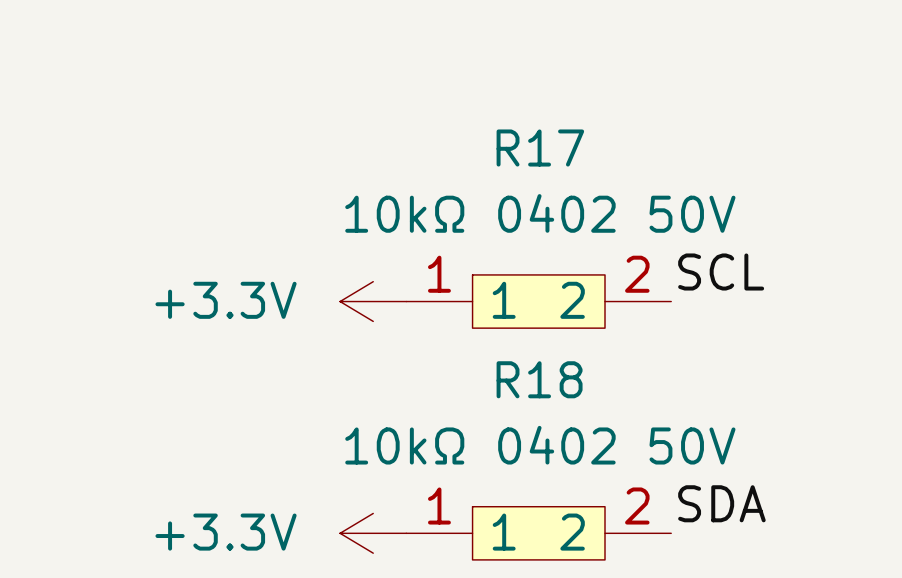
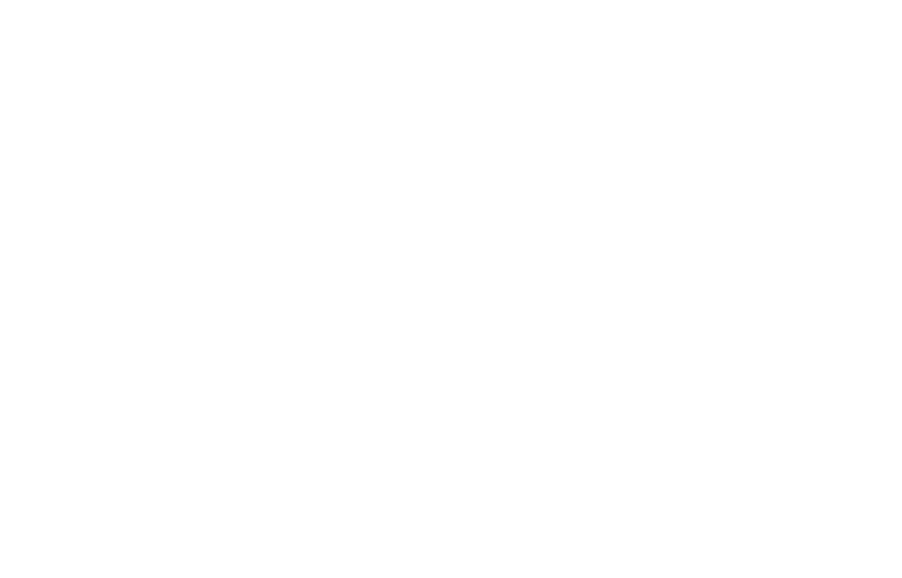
label: SCL (721, 272) -> none
power symbol: +3.3V (373, 301) -> none
R17: 10kΩ 0402 50V (538, 301) -> none
label: SDA (721, 503) -> none
power symbol: +3.3V (373, 533) -> none
R18: 10kΩ 0402 50V (538, 533) -> none

